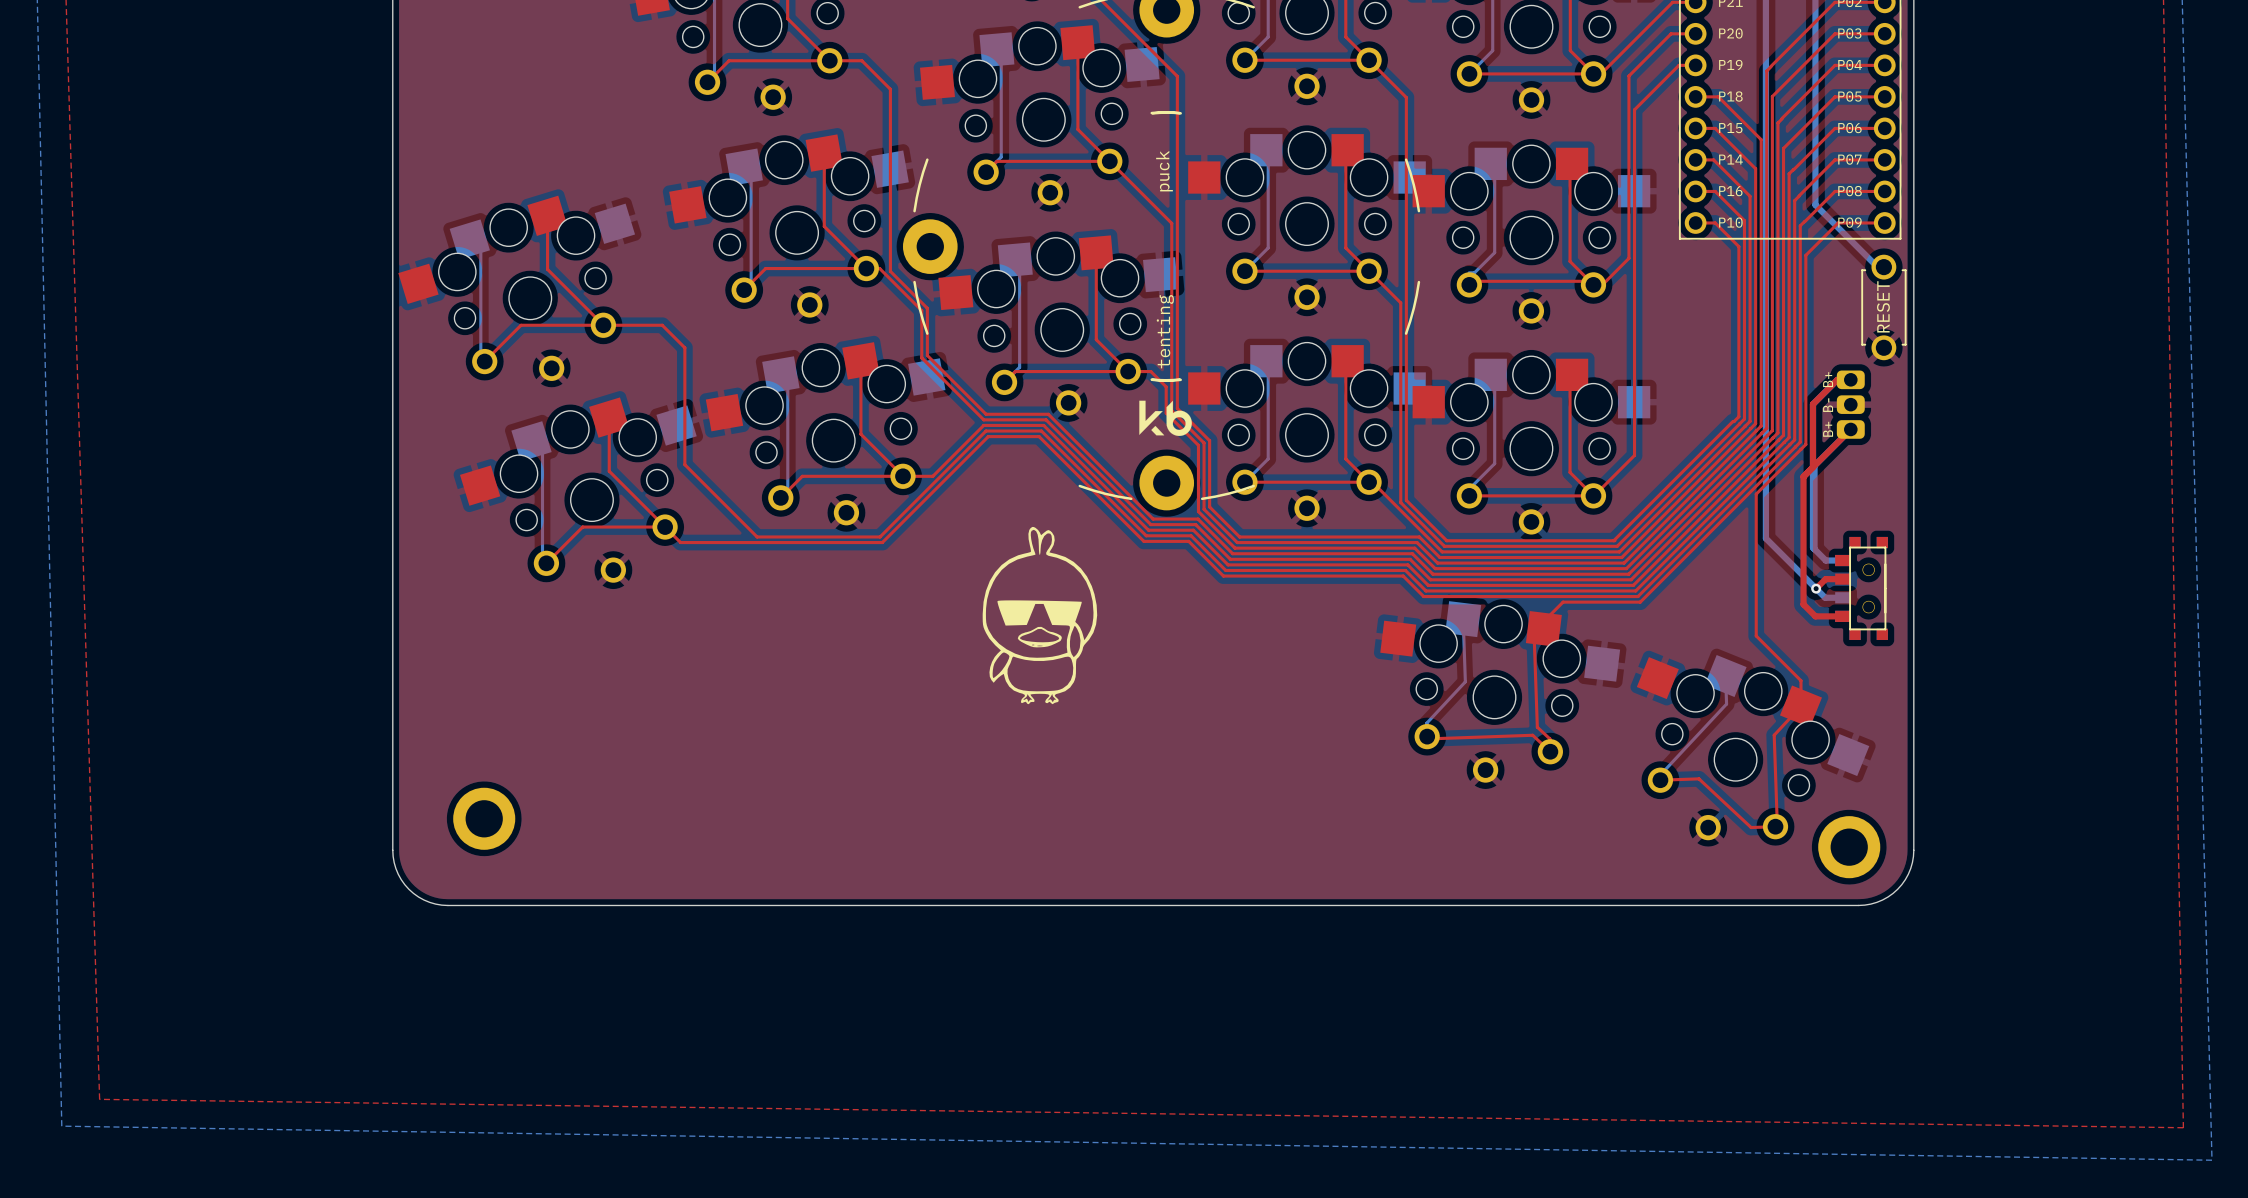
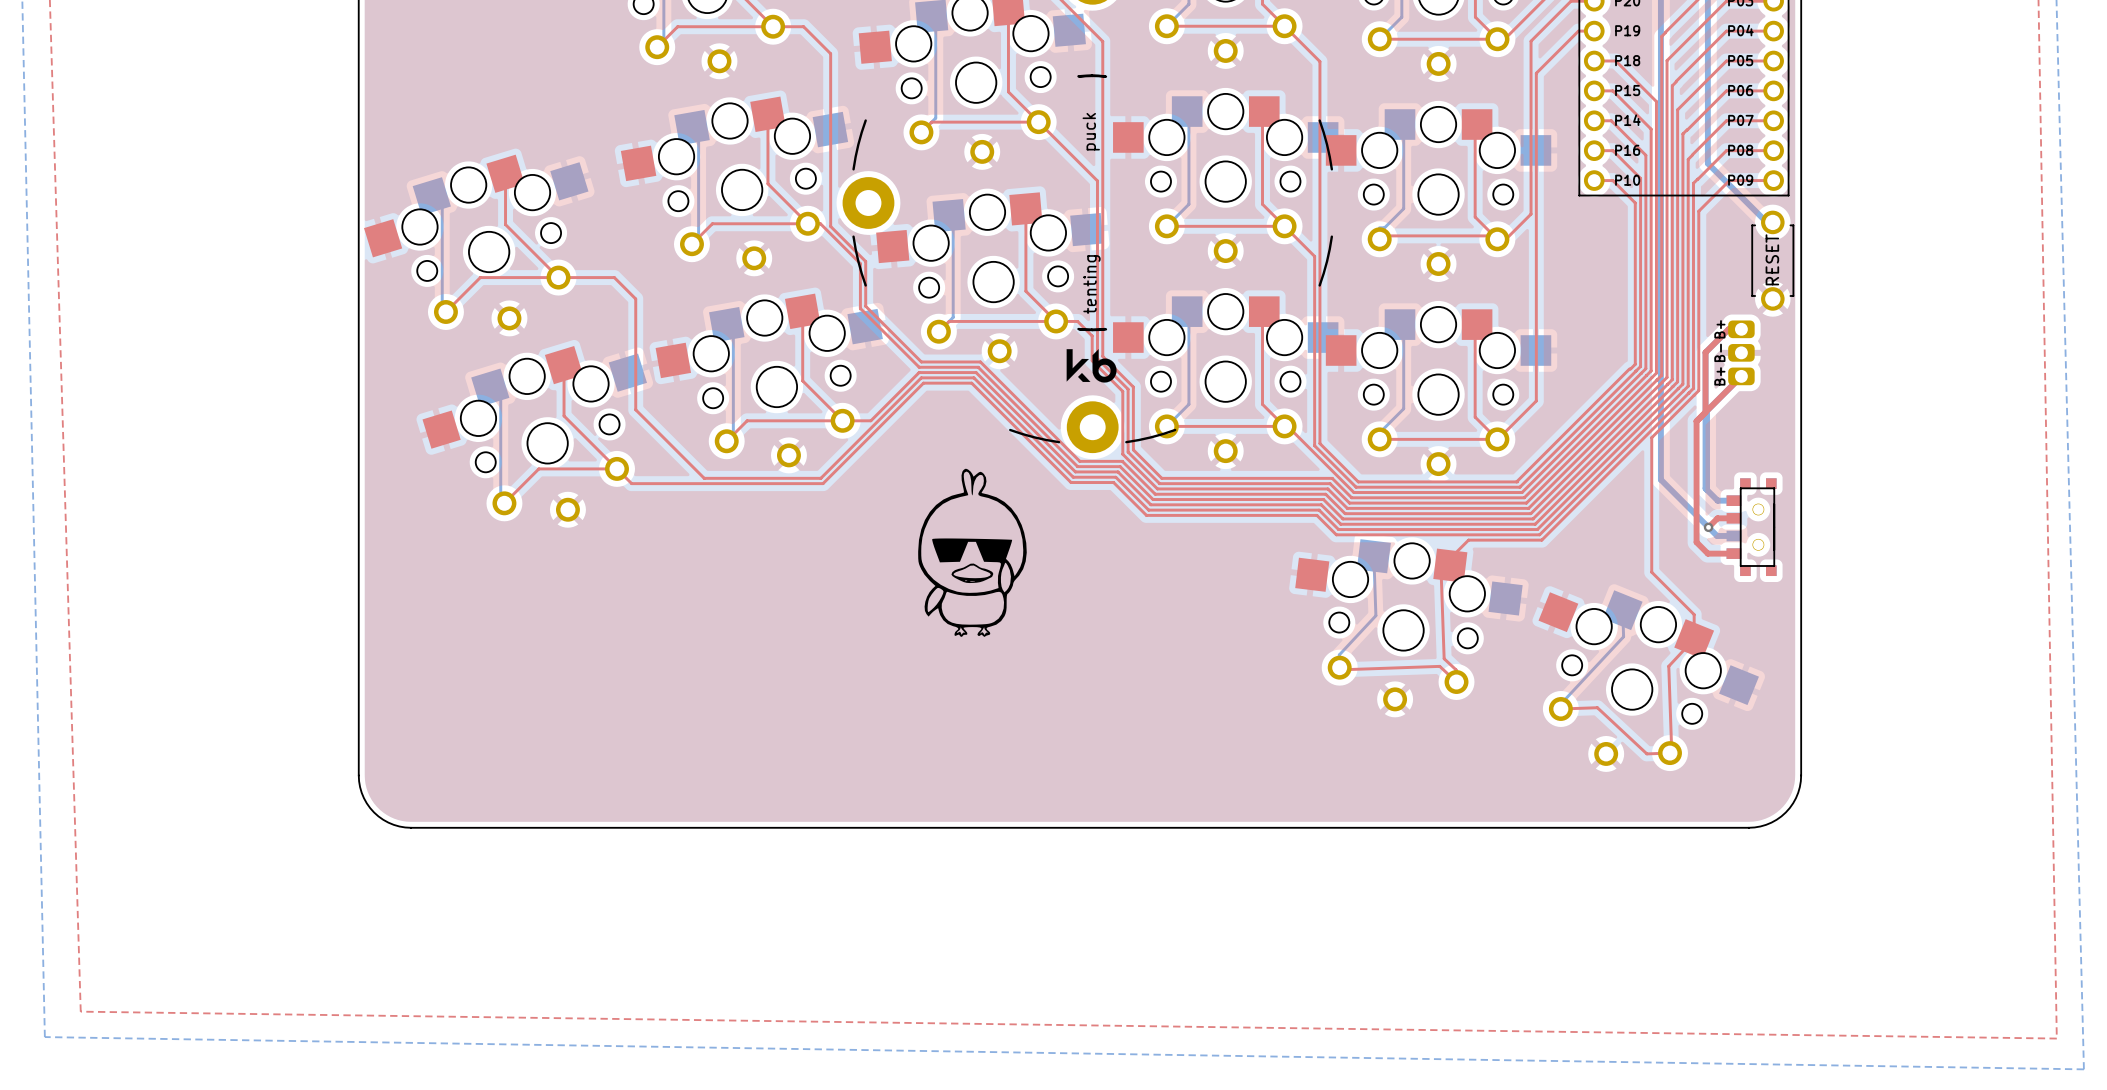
part: (484, 818) -> none
part: (1849, 847) -> none

